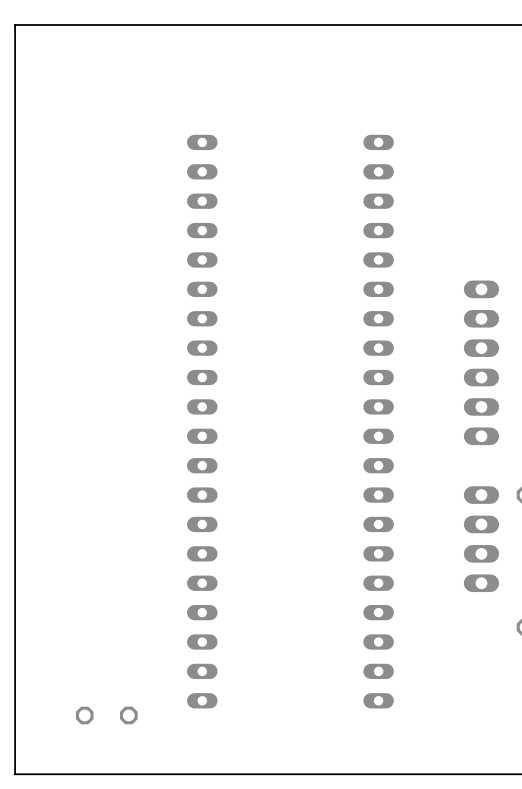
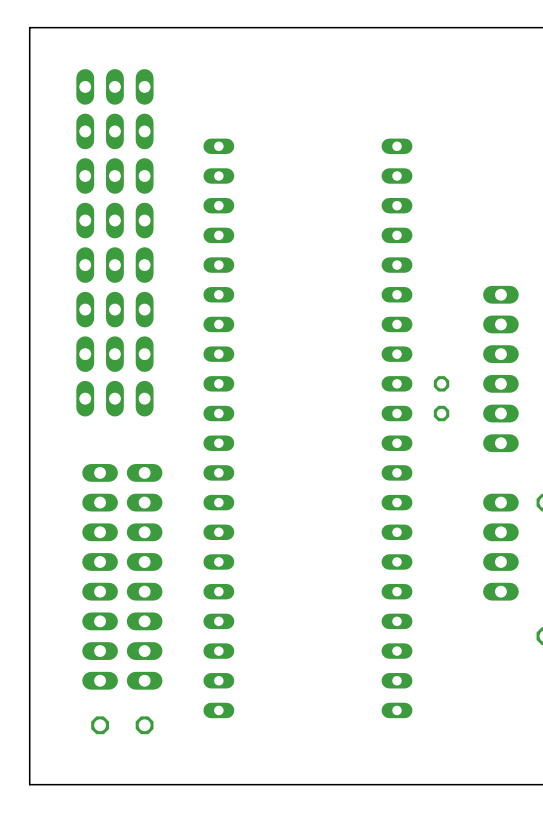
part: none -> (114, 86)
part: none -> (114, 131)
part: none -> (114, 175)
part: none -> (114, 220)
part: none -> (114, 265)
part: none -> (114, 309)
part: none -> (114, 354)
part: none -> (114, 398)
part: none -> (441, 398)
part: none -> (100, 576)
part: none -> (144, 576)

